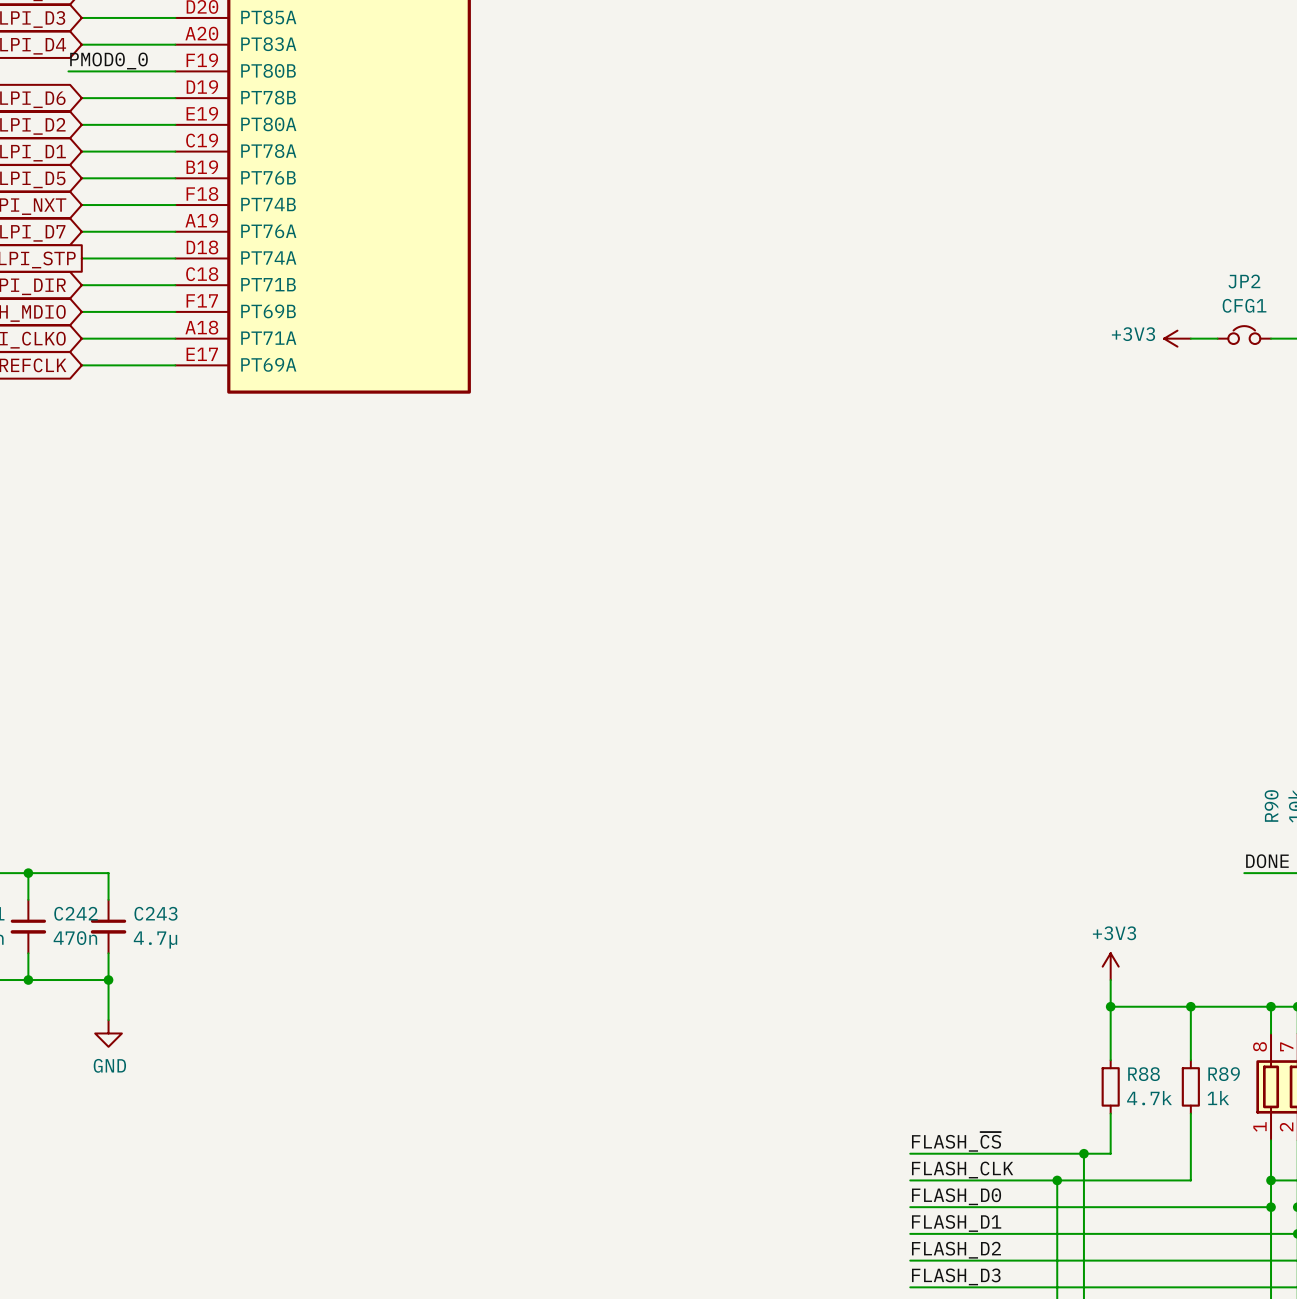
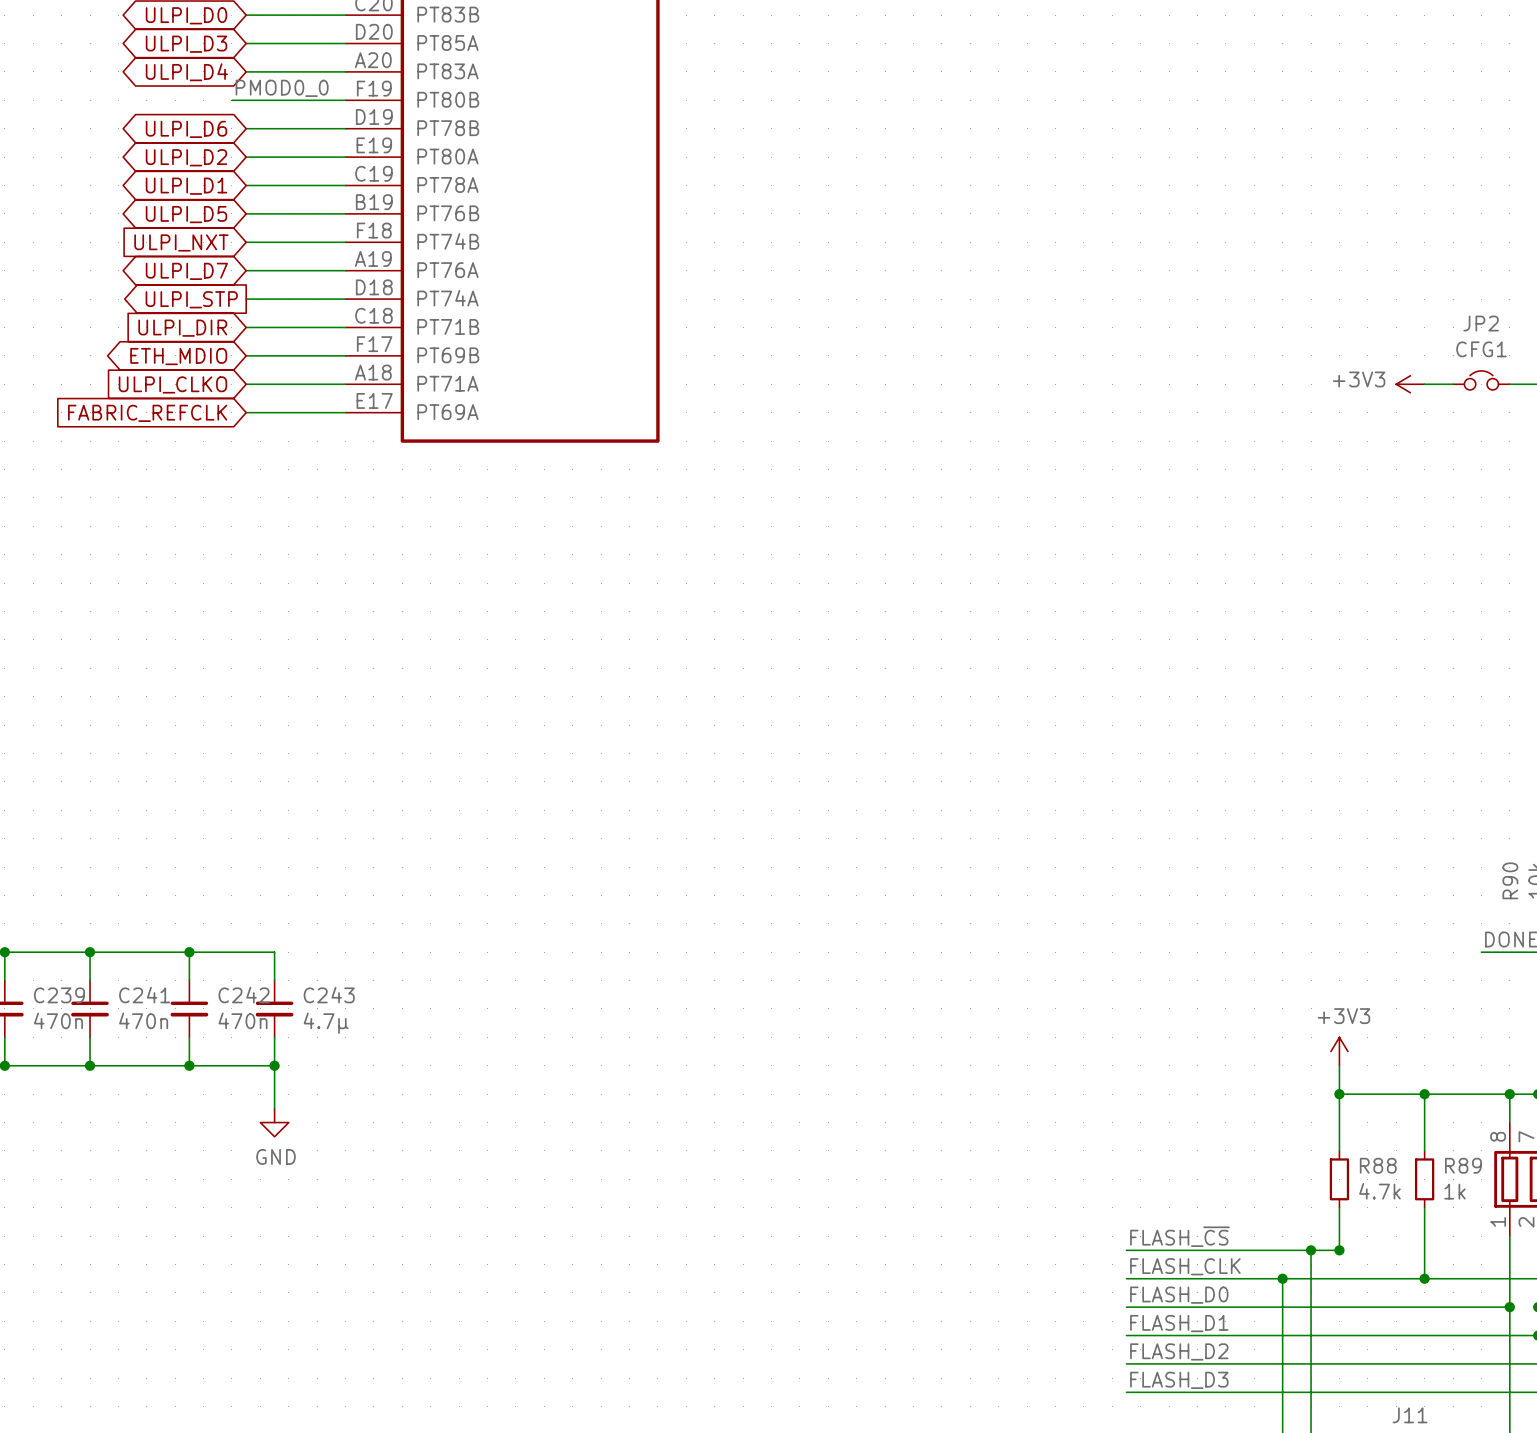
junction: none -> (1339, 1250)
wire: none -> (1424, 1278) (1509, 1278)
junction: none -> (1424, 1278)
junction: (1271, 1180) -> none

